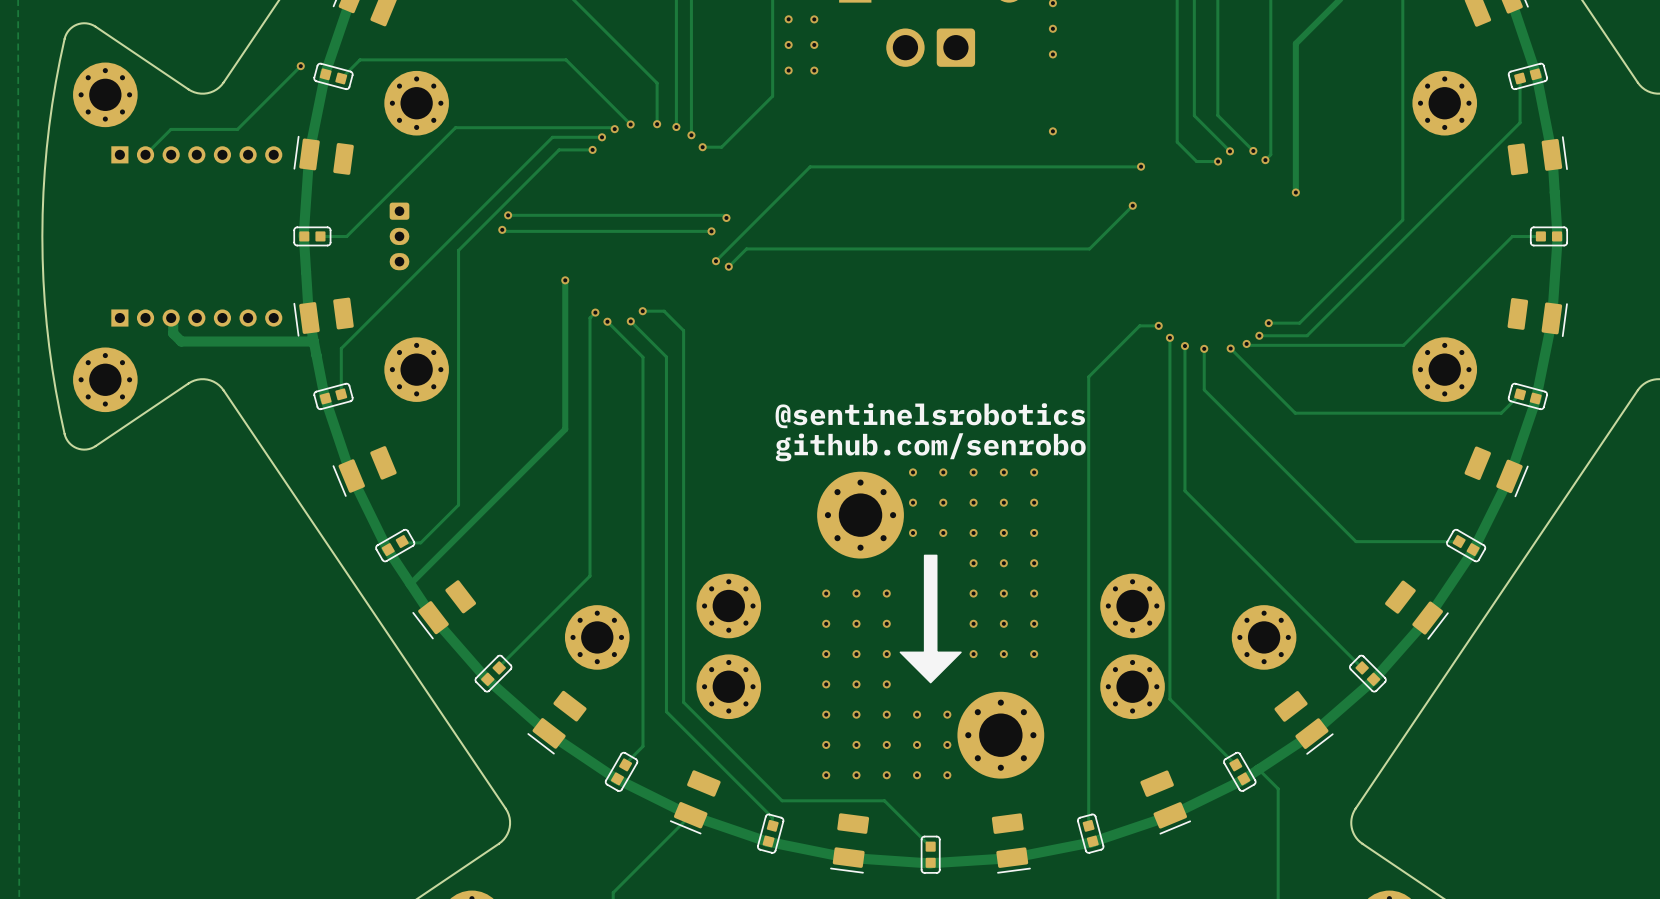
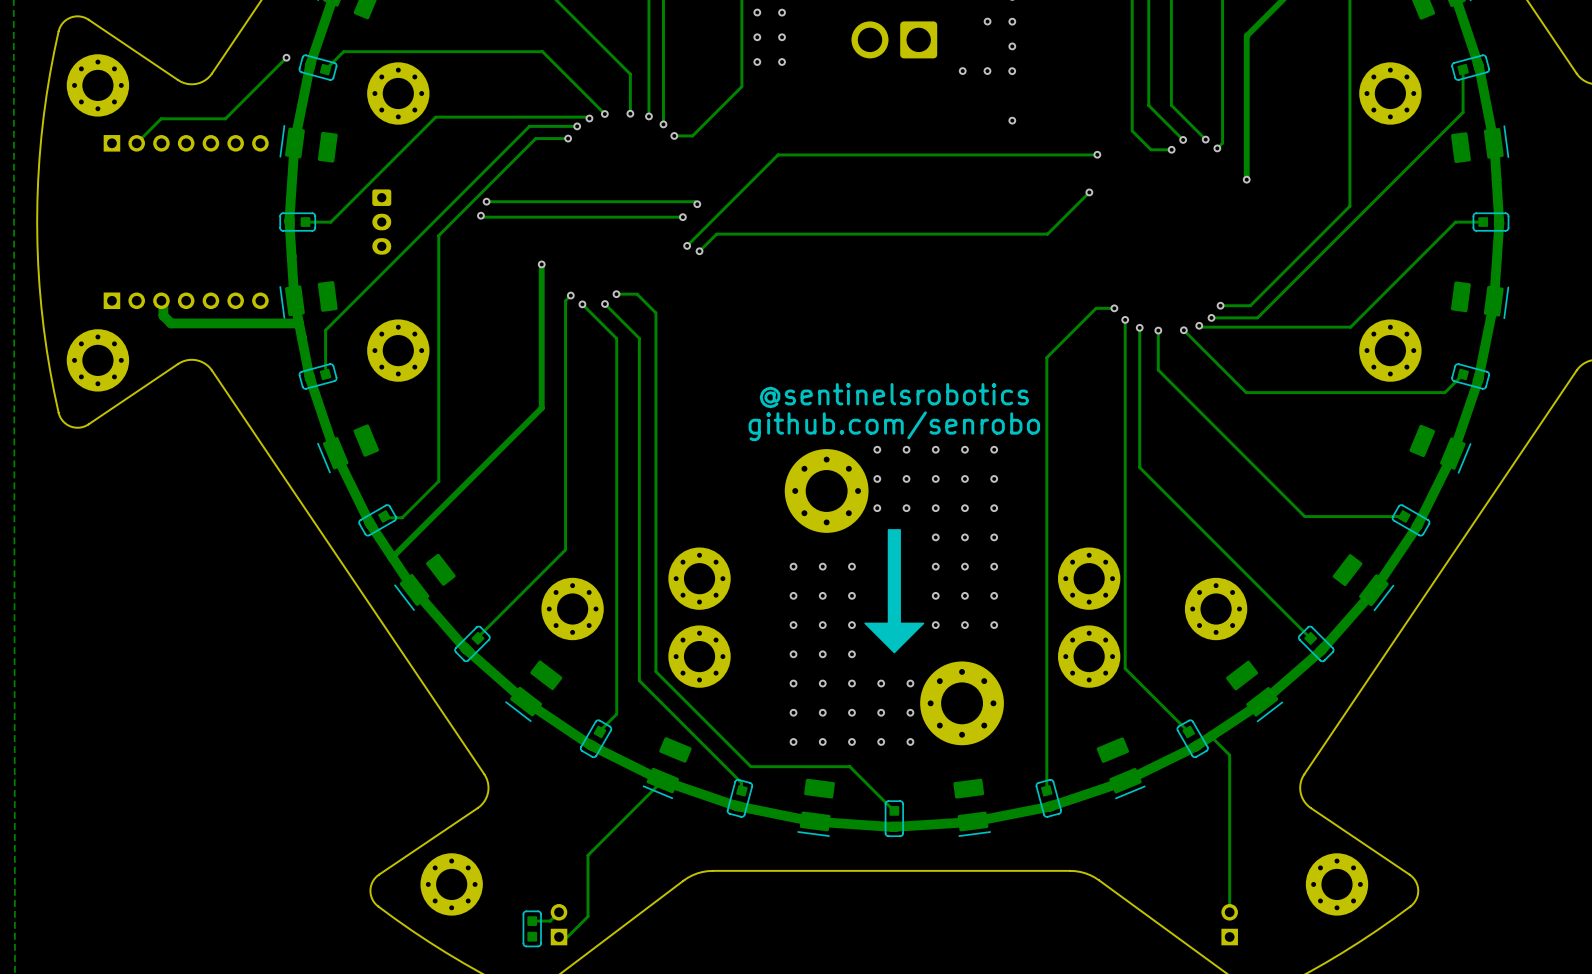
via: none -> (987, 21)
via: none -> (962, 71)
via: none -> (987, 71)
via: none -> (1012, 71)

